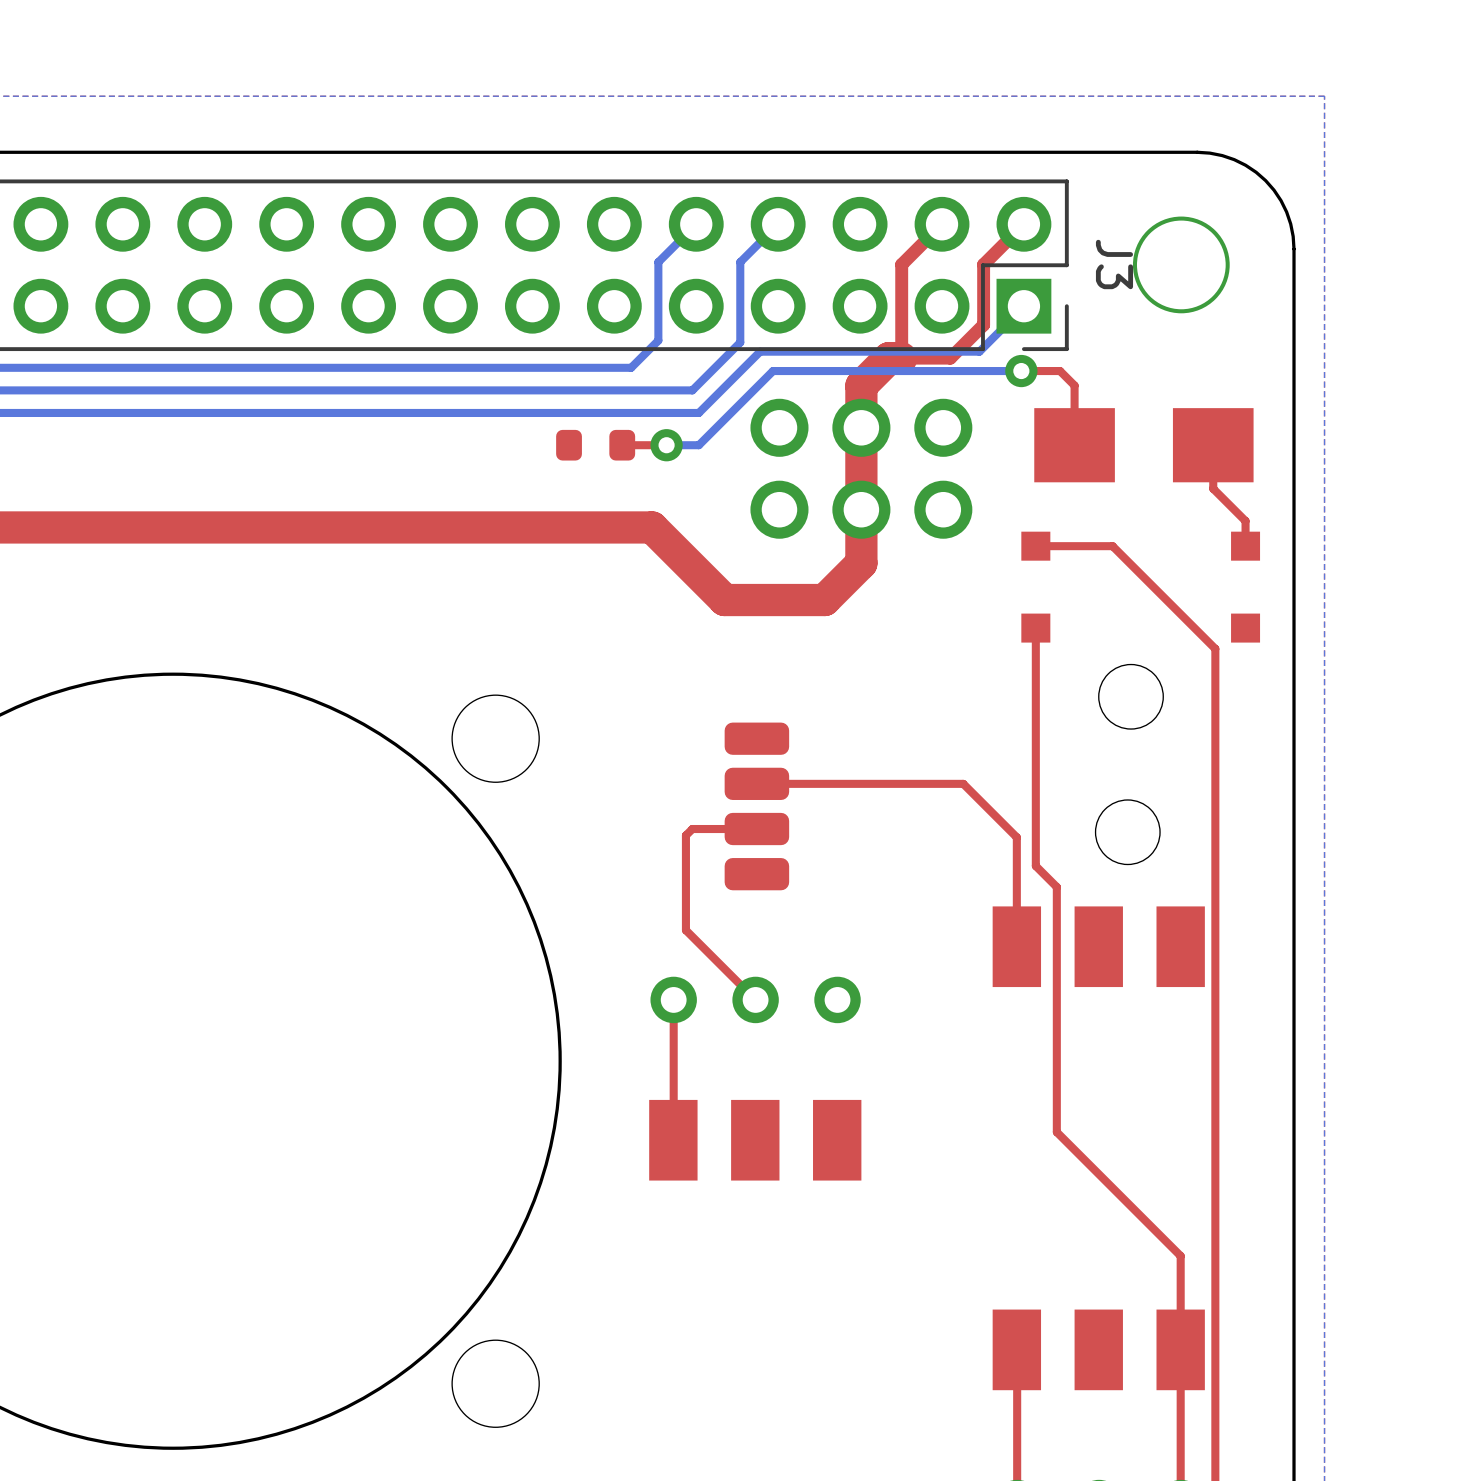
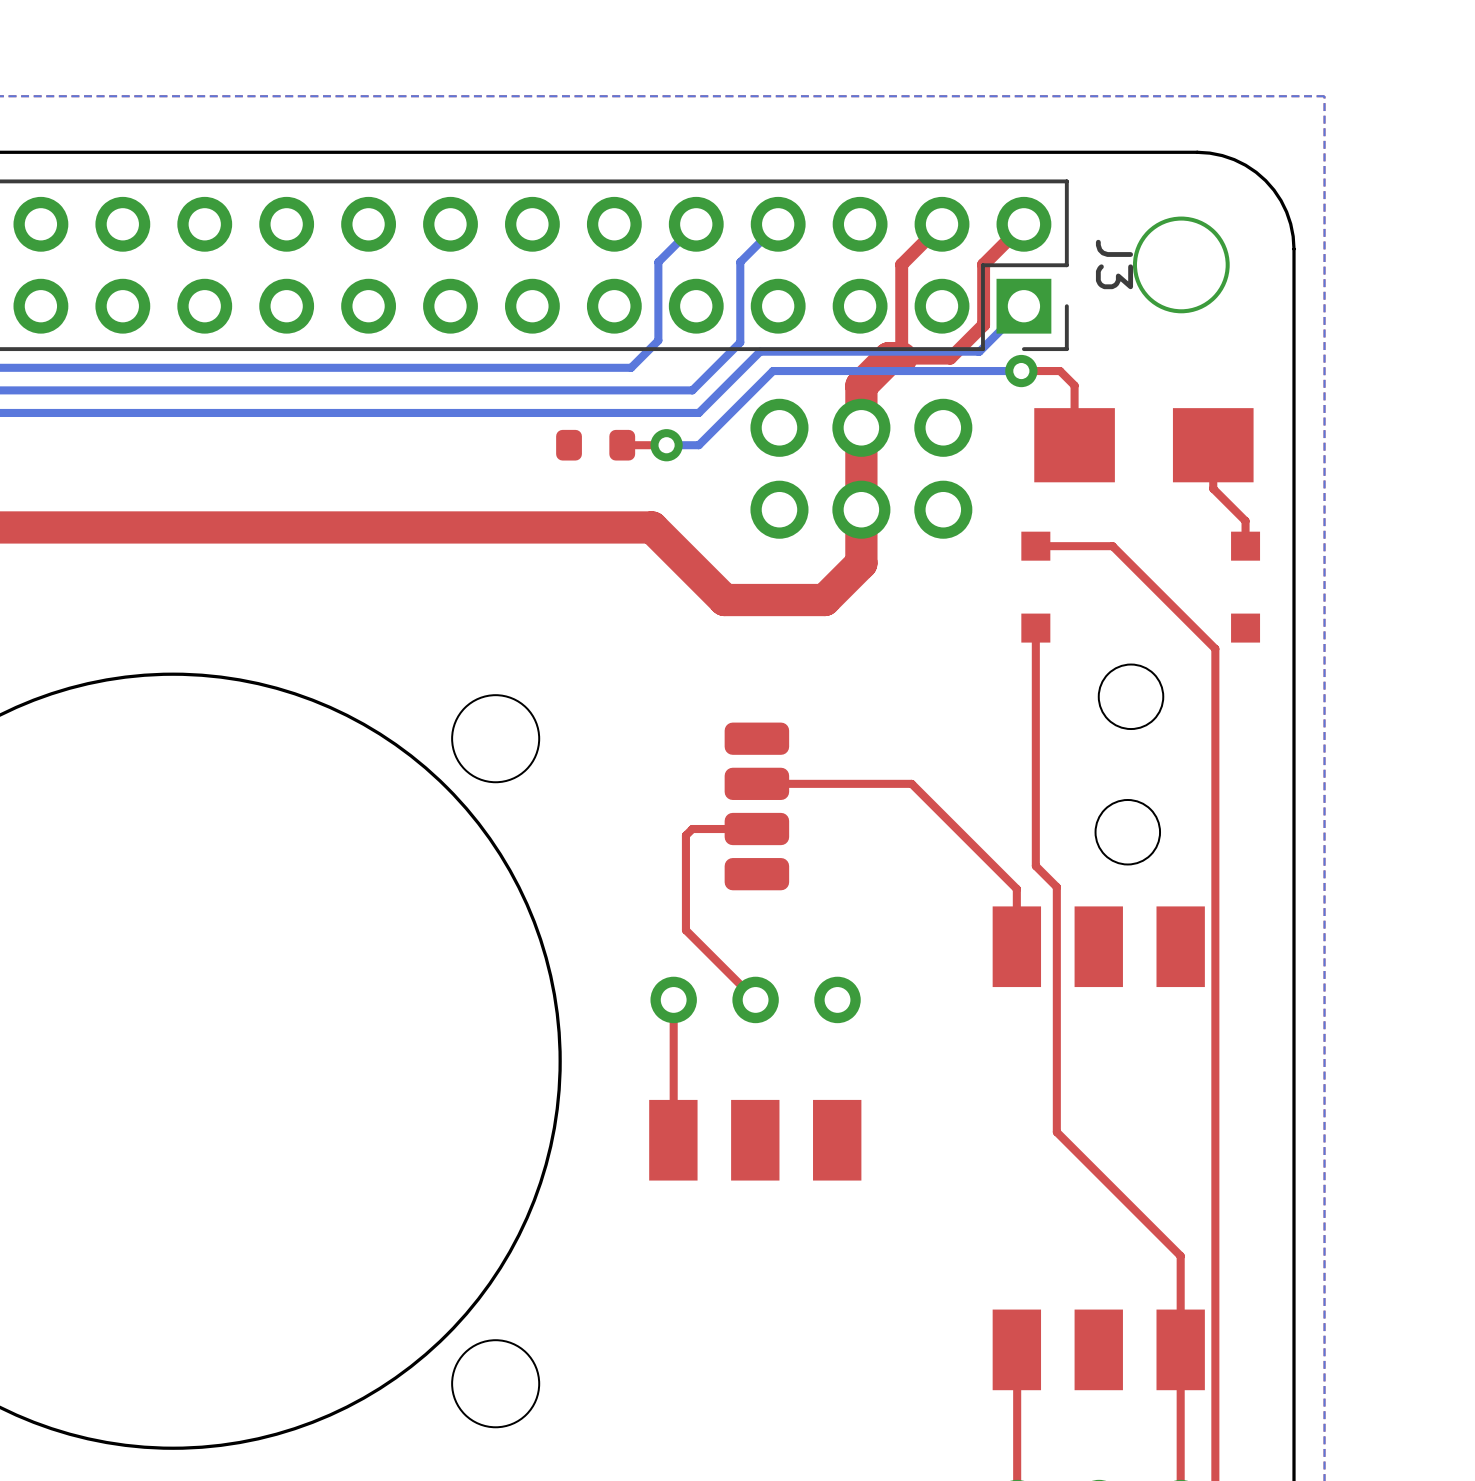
top track: (911, 783) (963, 783) (1016, 837) (1016, 889) -> (911, 783) (1016, 889)

